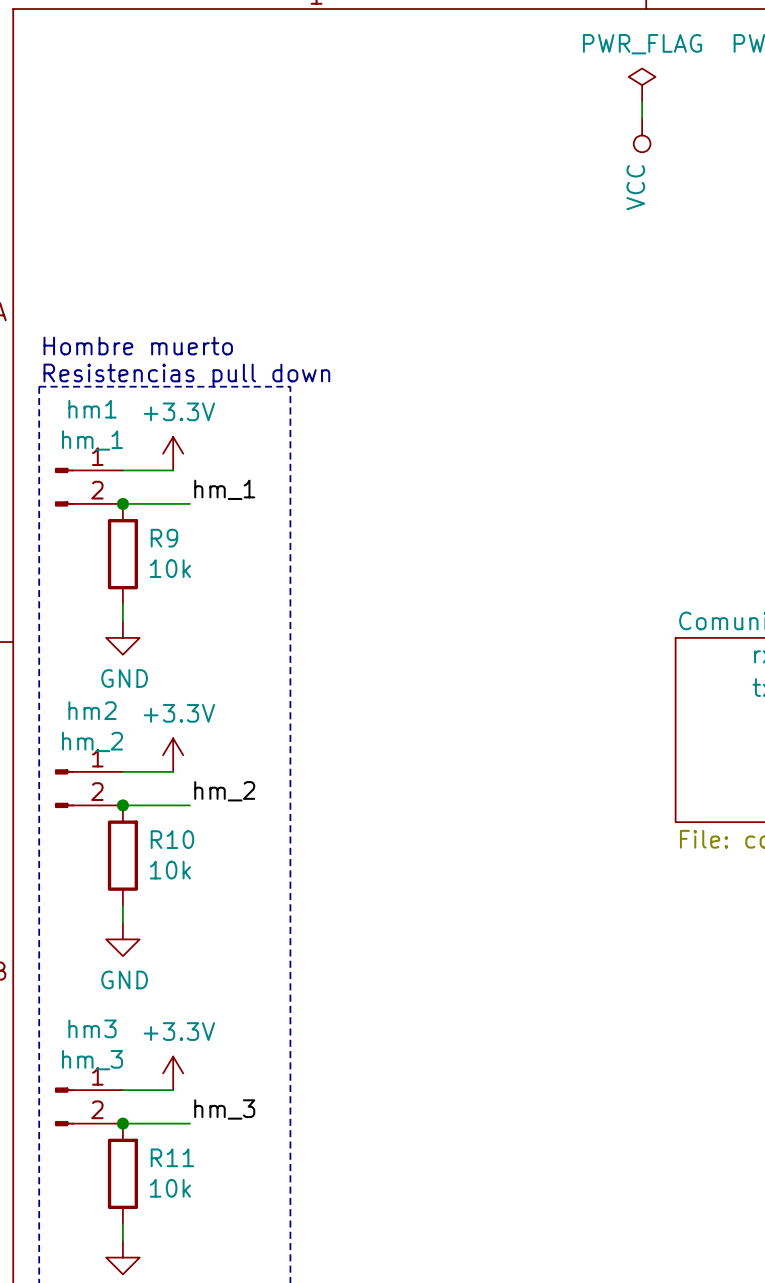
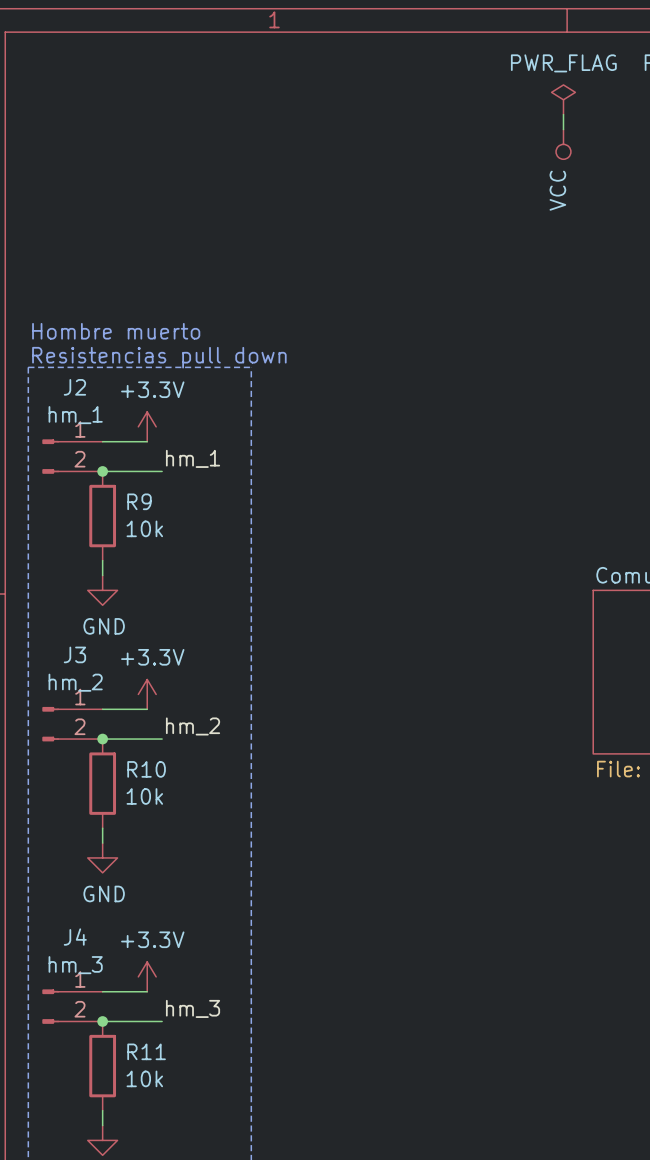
hm1 name: hm1 (92, 409) -> J2 (74, 387)
hm2 name: hm2 (92, 710) -> J3 (74, 654)
hm3 name: hm3 (92, 1028) -> J4 (75, 937)

